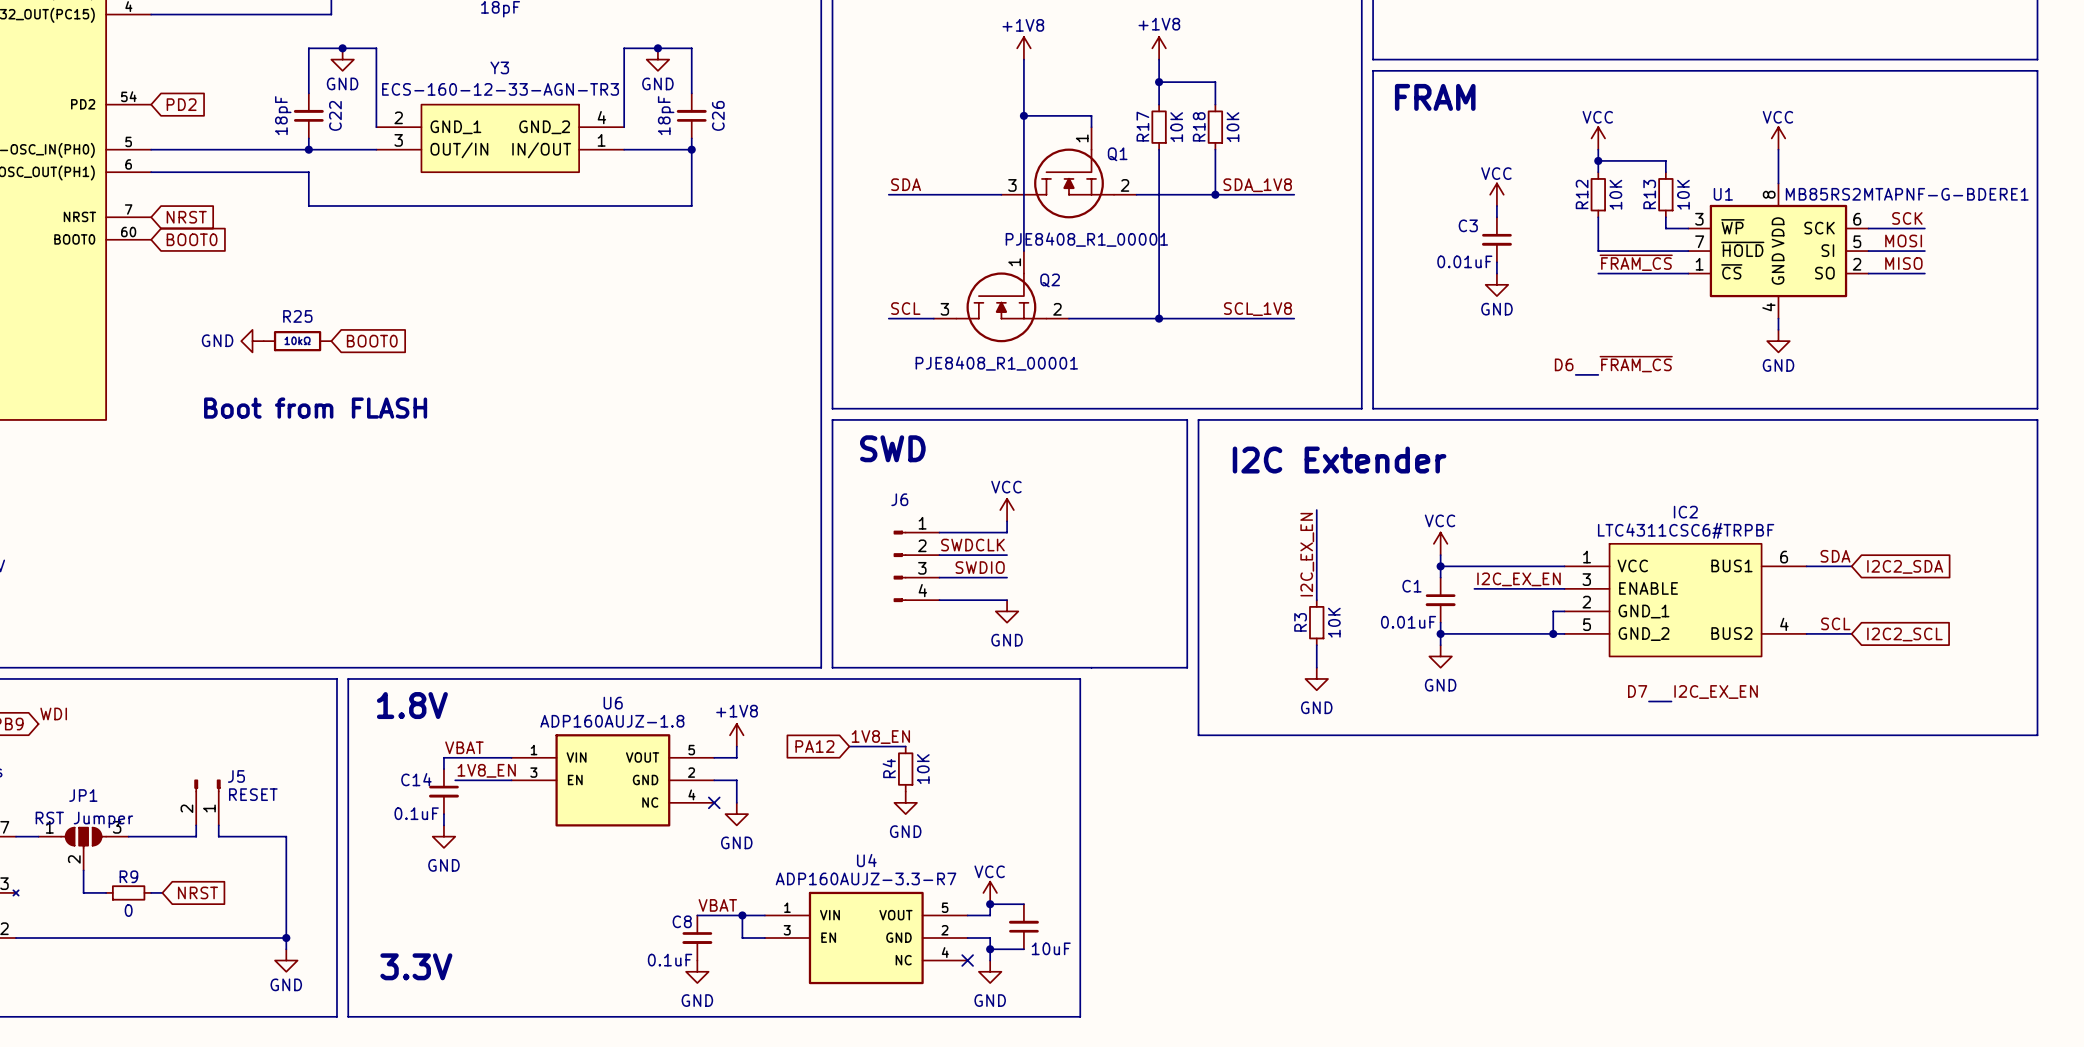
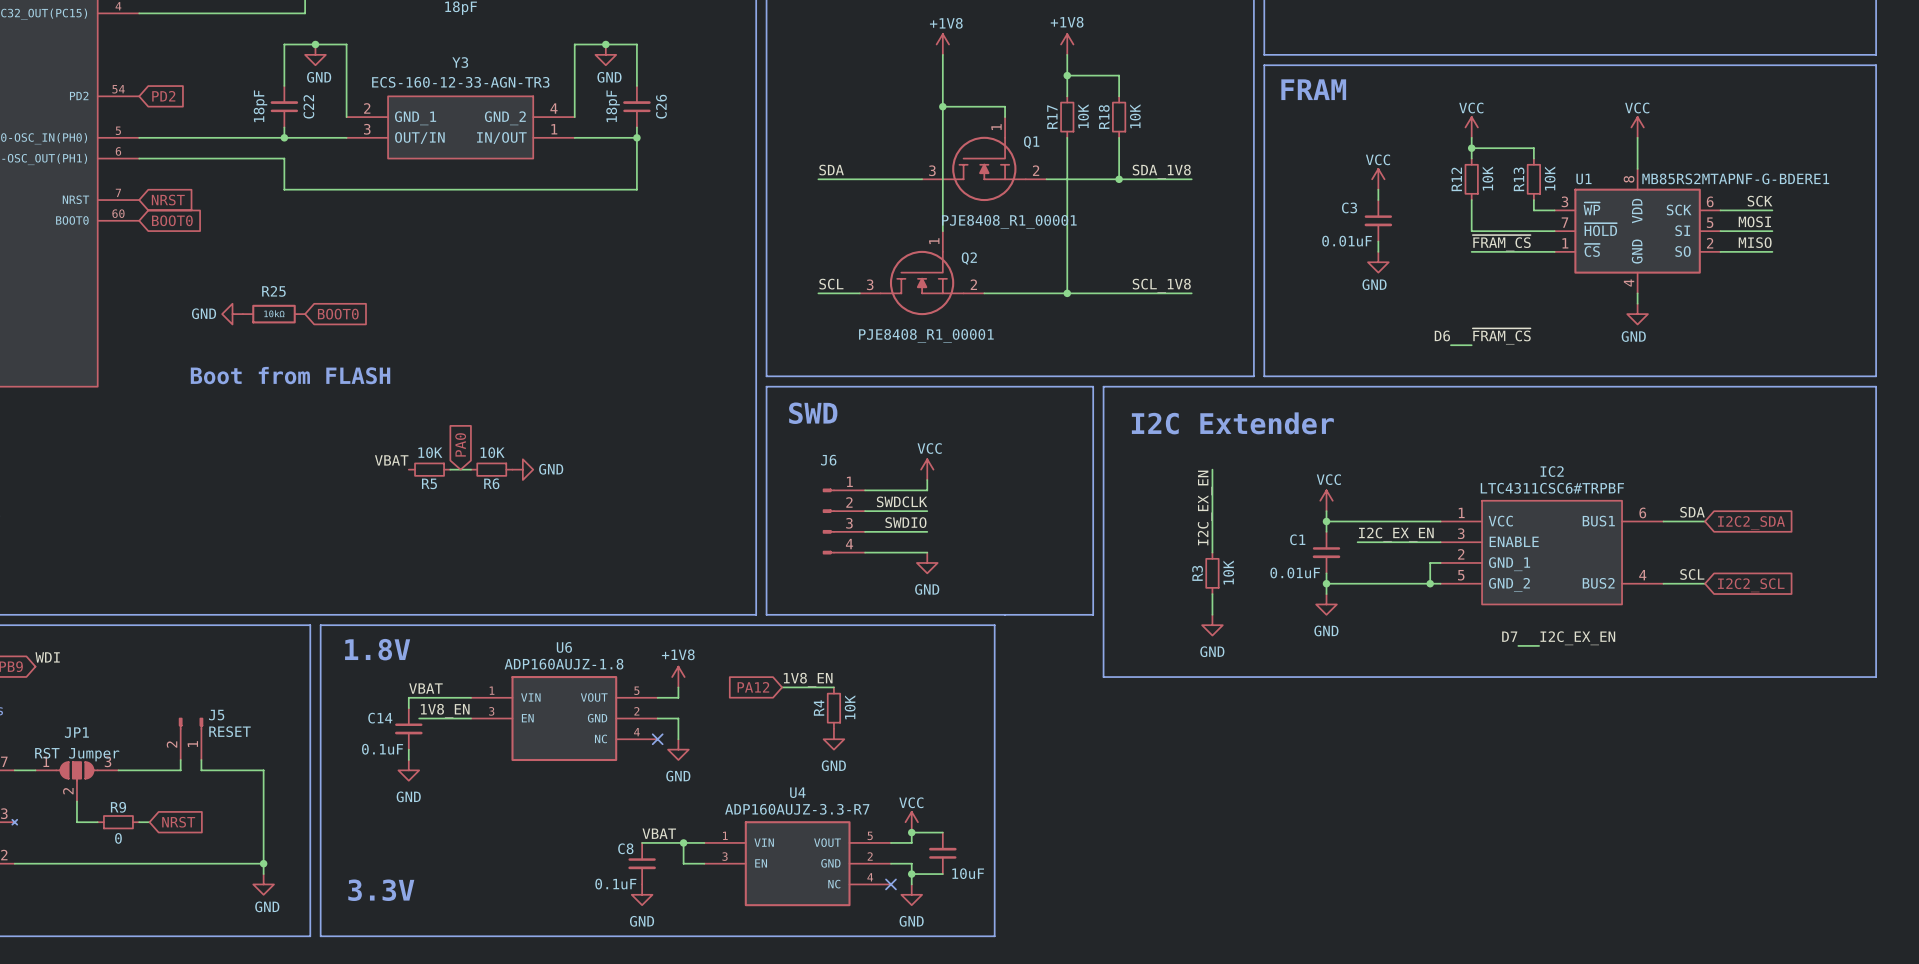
global label: none -> PA0 (460, 444)
label: none -> VBAT (391, 460)
R5: none -> 10K (429, 469)
wire: none -> (450, 469) (471, 469)
R6: none -> 10K (491, 469)
power symbol: none -> GND (522, 469)

